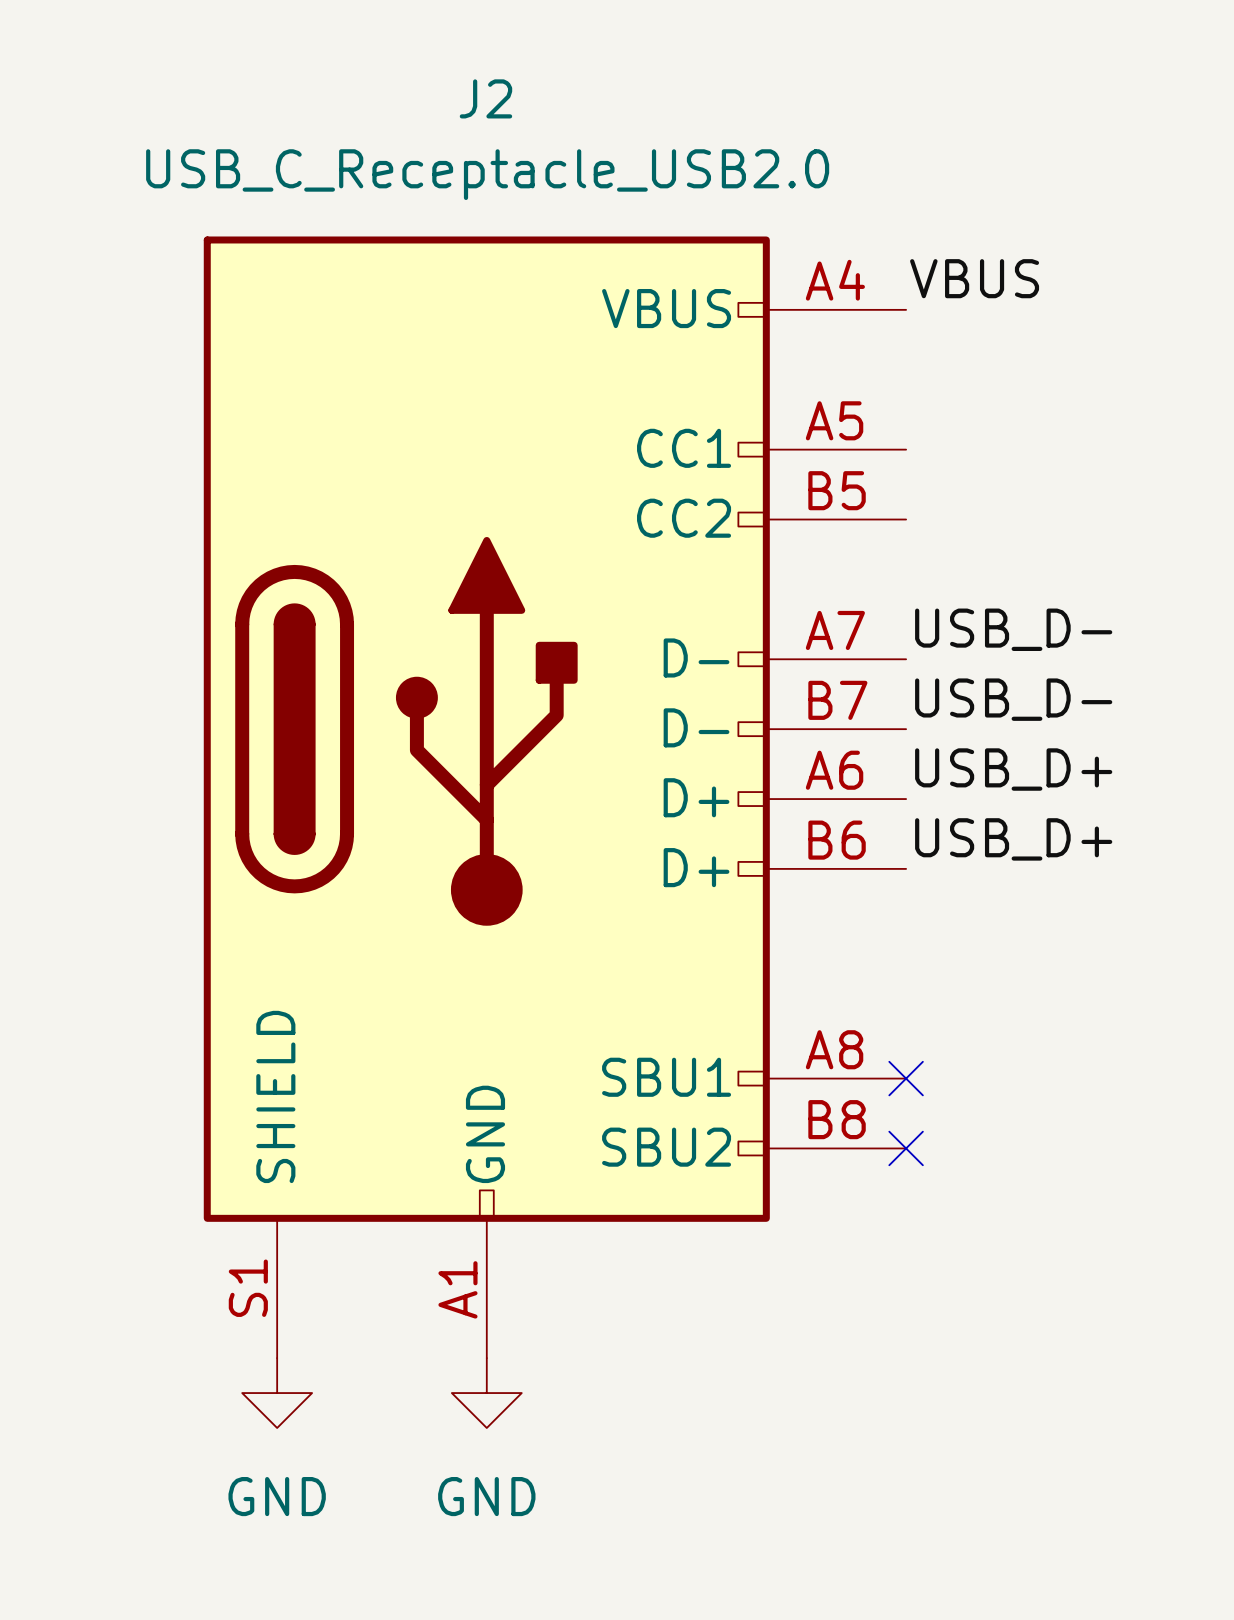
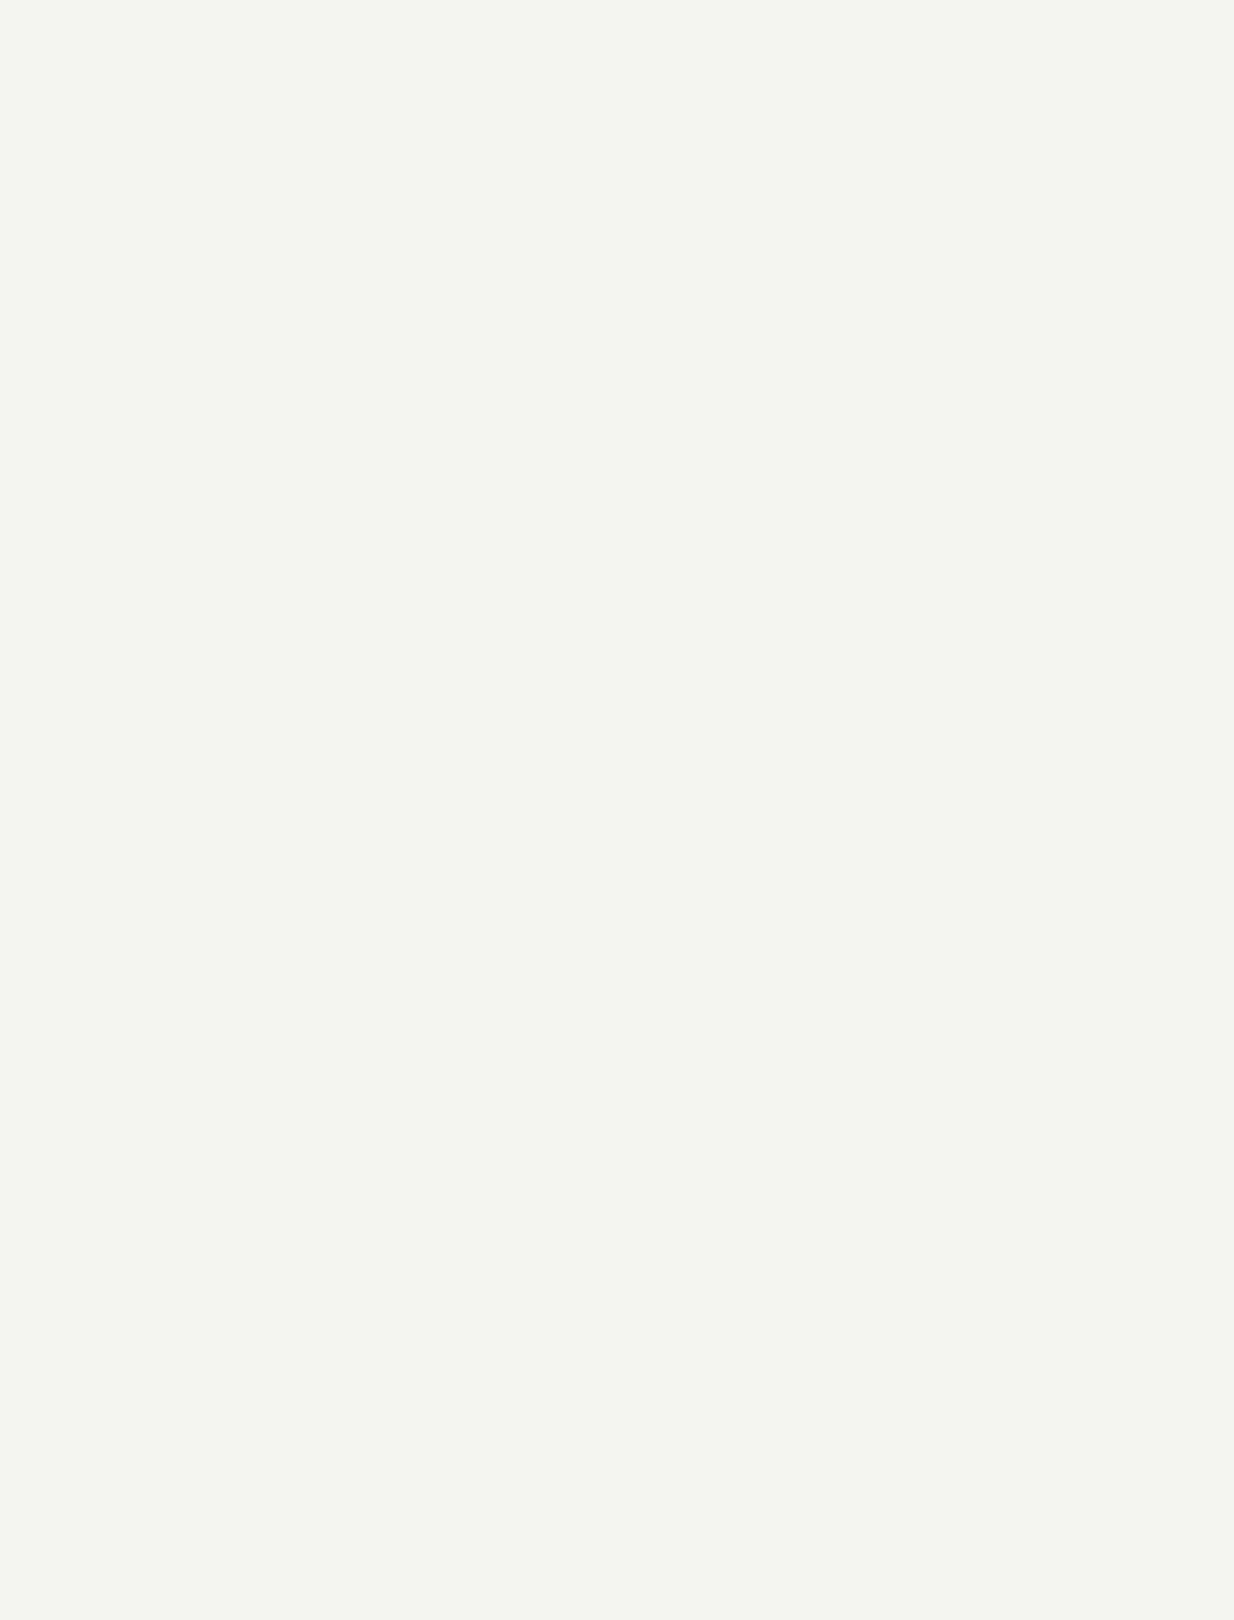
label: VBUS (974, 278) -> none
label: USB_D- (1013, 629) -> none
label: USB_D- (1013, 699) -> none
label: USB_D+ (1013, 769) -> none
J2: USB_C_Receptacle_USB2.0 (554, 797) -> none
label: USB_D+ (1013, 839) -> none
no-connect mark: (906, 1078) -> none
no-connect mark: (906, 1148) -> none
power symbol: GND (277, 1393) -> none
power symbol: GND (486, 1393) -> none

